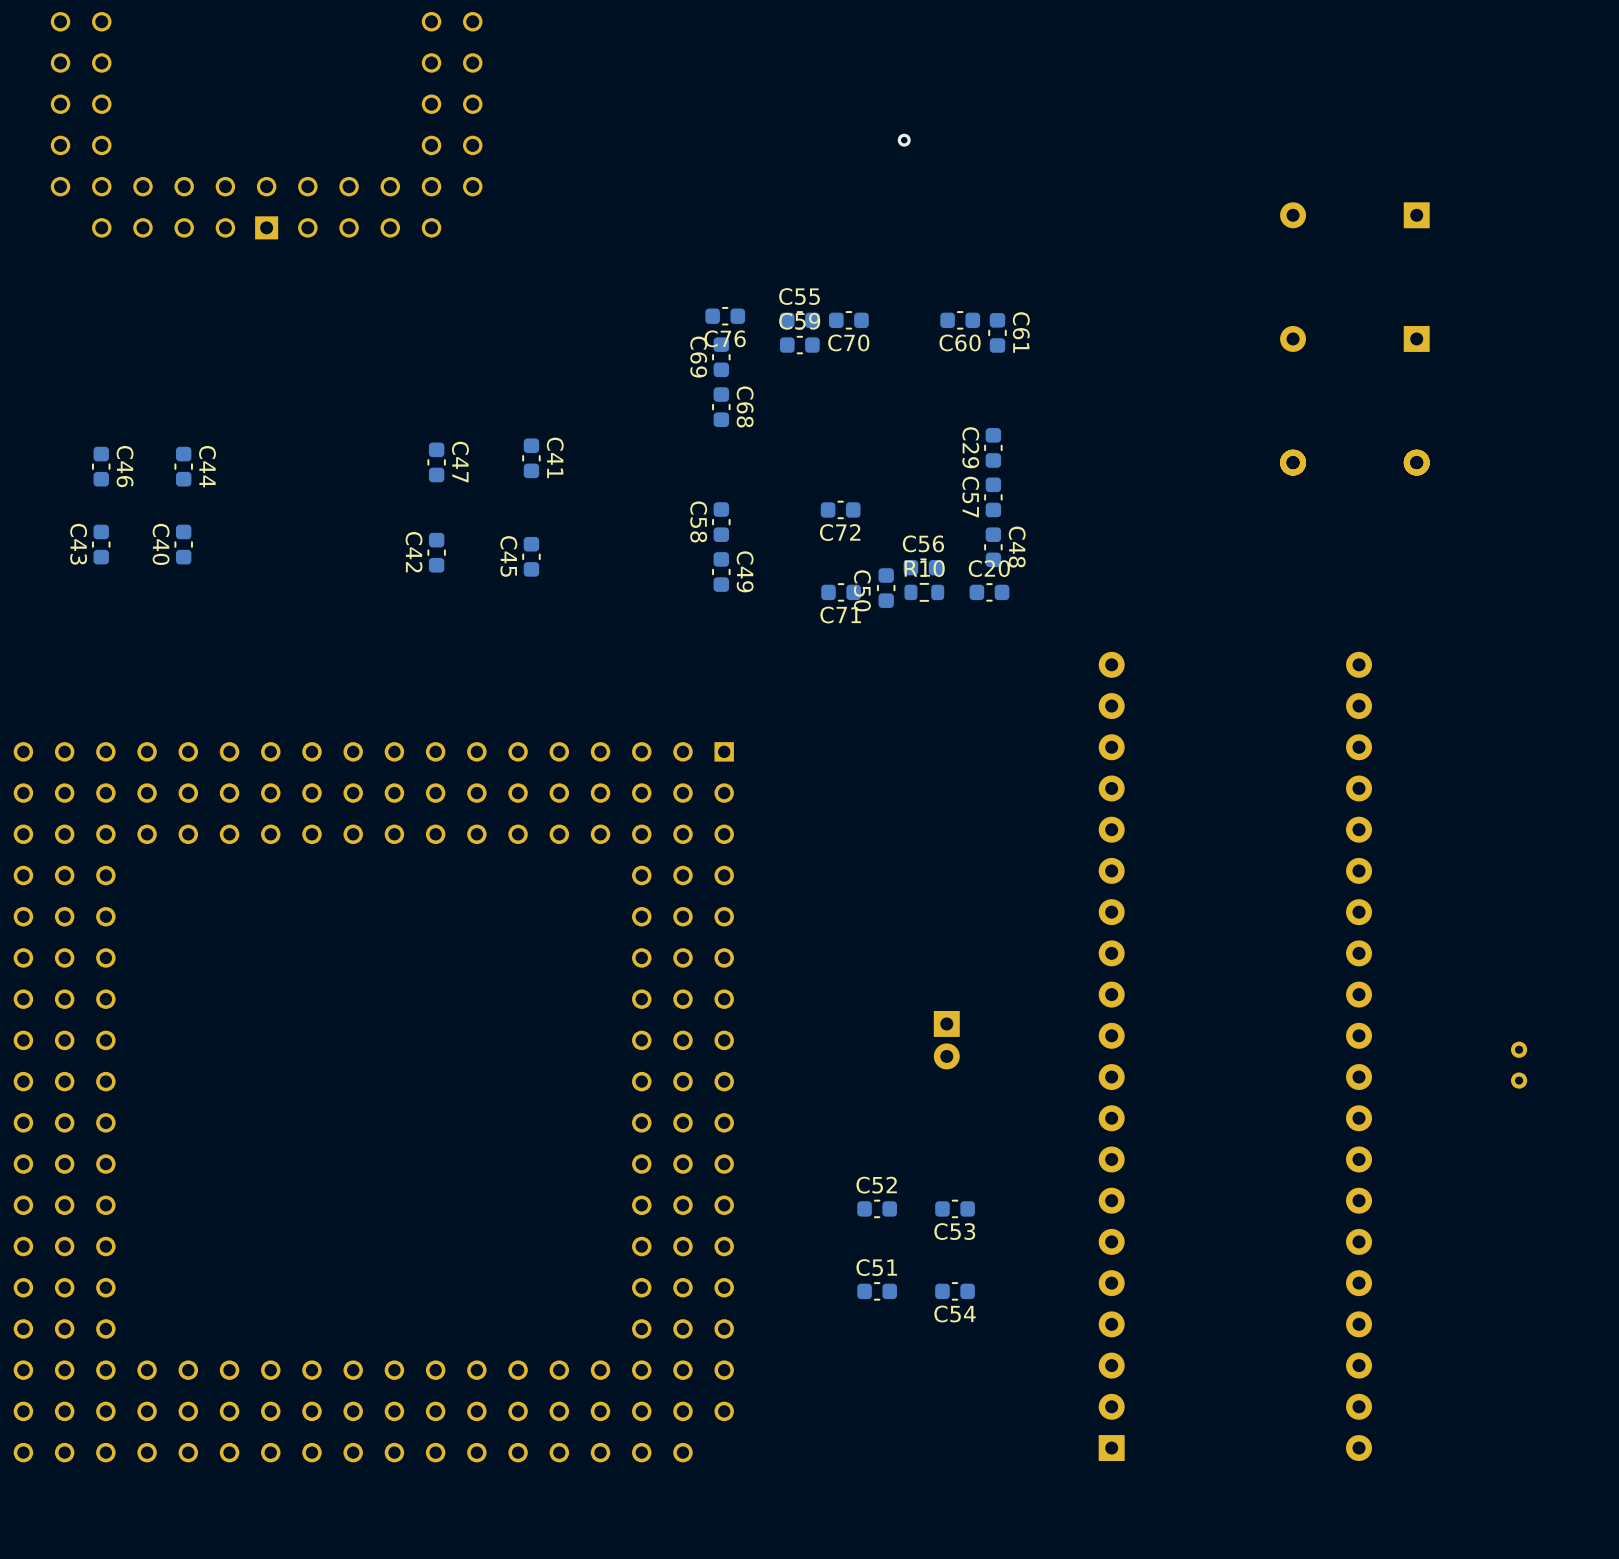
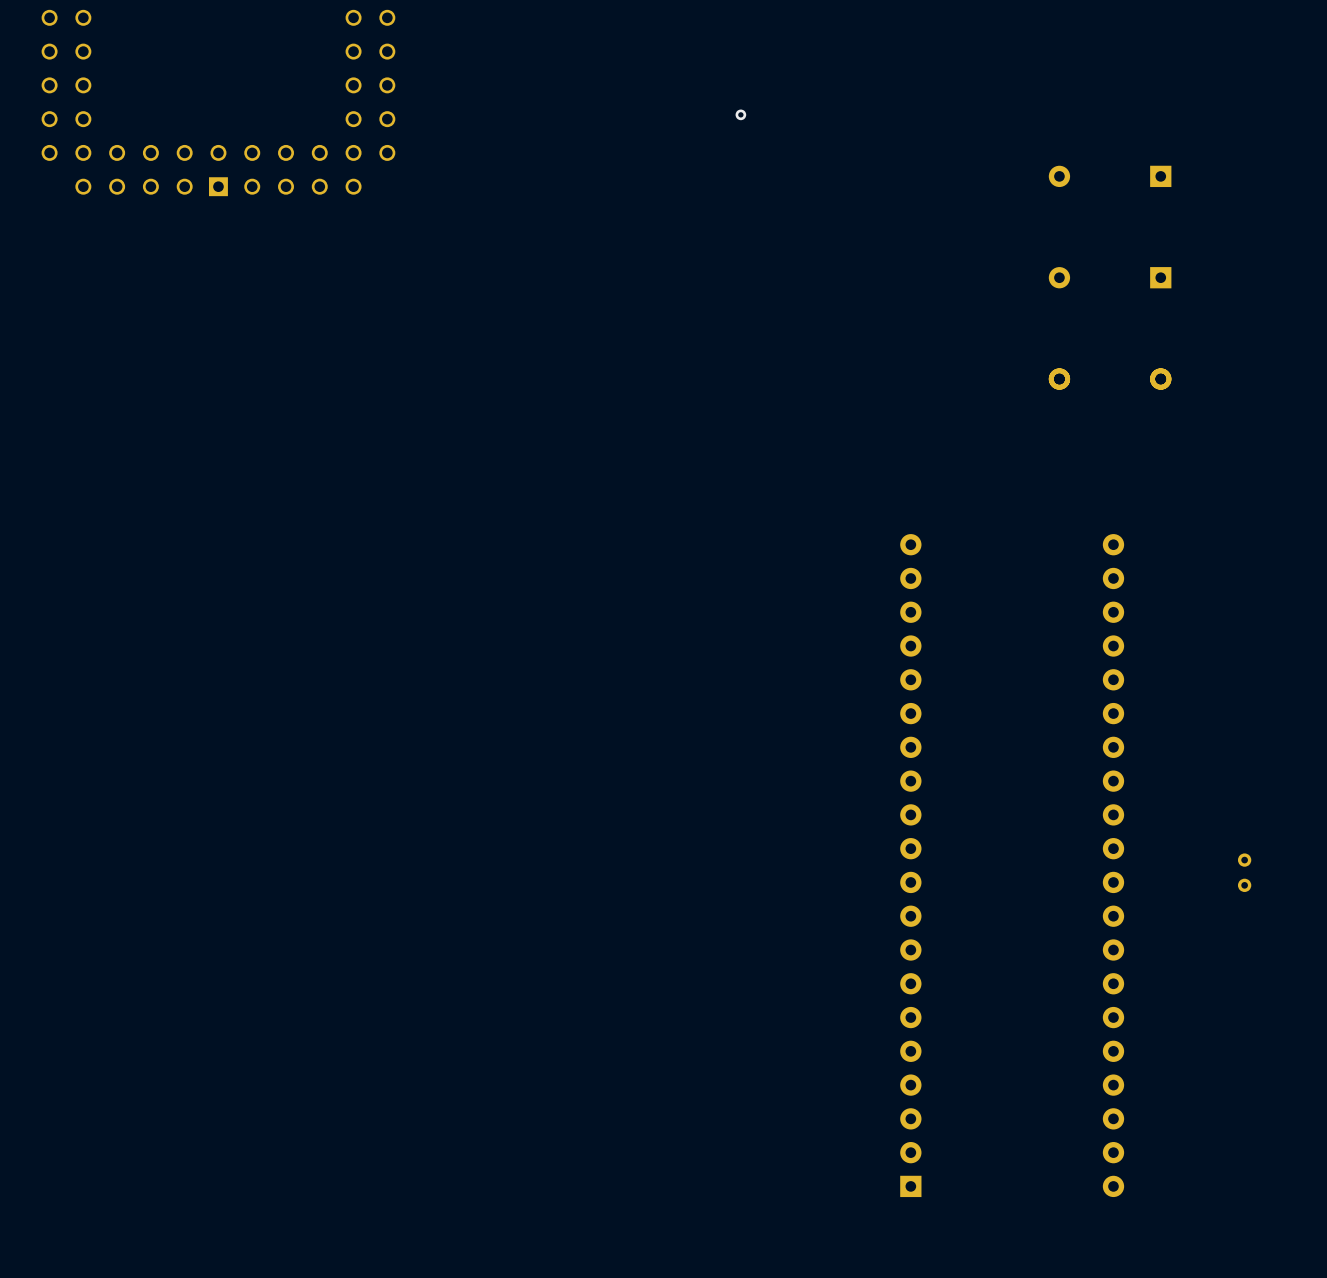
C76: (725, 316) -> none
C55: (799, 320) -> none
C70: (848, 320) -> none
C60: (960, 320) -> none
C61: (997, 332) -> none
C59: (799, 345) -> none
C69: (721, 357) -> none
C68: (721, 407) -> none
C29: (993, 447) -> none
C41: (531, 458) -> none
C47: (436, 462) -> none
C46: (101, 466) -> none
C44: (183, 466) -> none
C57: (993, 497) -> none
C72: (840, 509) -> none
C58: (721, 522) -> none
C43: (101, 544) -> none
C40: (183, 544) -> none
C48: (993, 547) -> none
C42: (436, 552) -> none
C45: (531, 556) -> none
C56: (923, 567) -> none
C49: (721, 572) -> none
C50: (886, 588) -> none
C71: (841, 592) -> none
R10: (924, 592) -> none
C20: (989, 592) -> none
part: (946, 1040) -> none
part: (373, 1102) -> none
C52: (877, 1208) -> none
C53: (955, 1208) -> none
C51: (877, 1291) -> none
C54: (955, 1291) -> none

